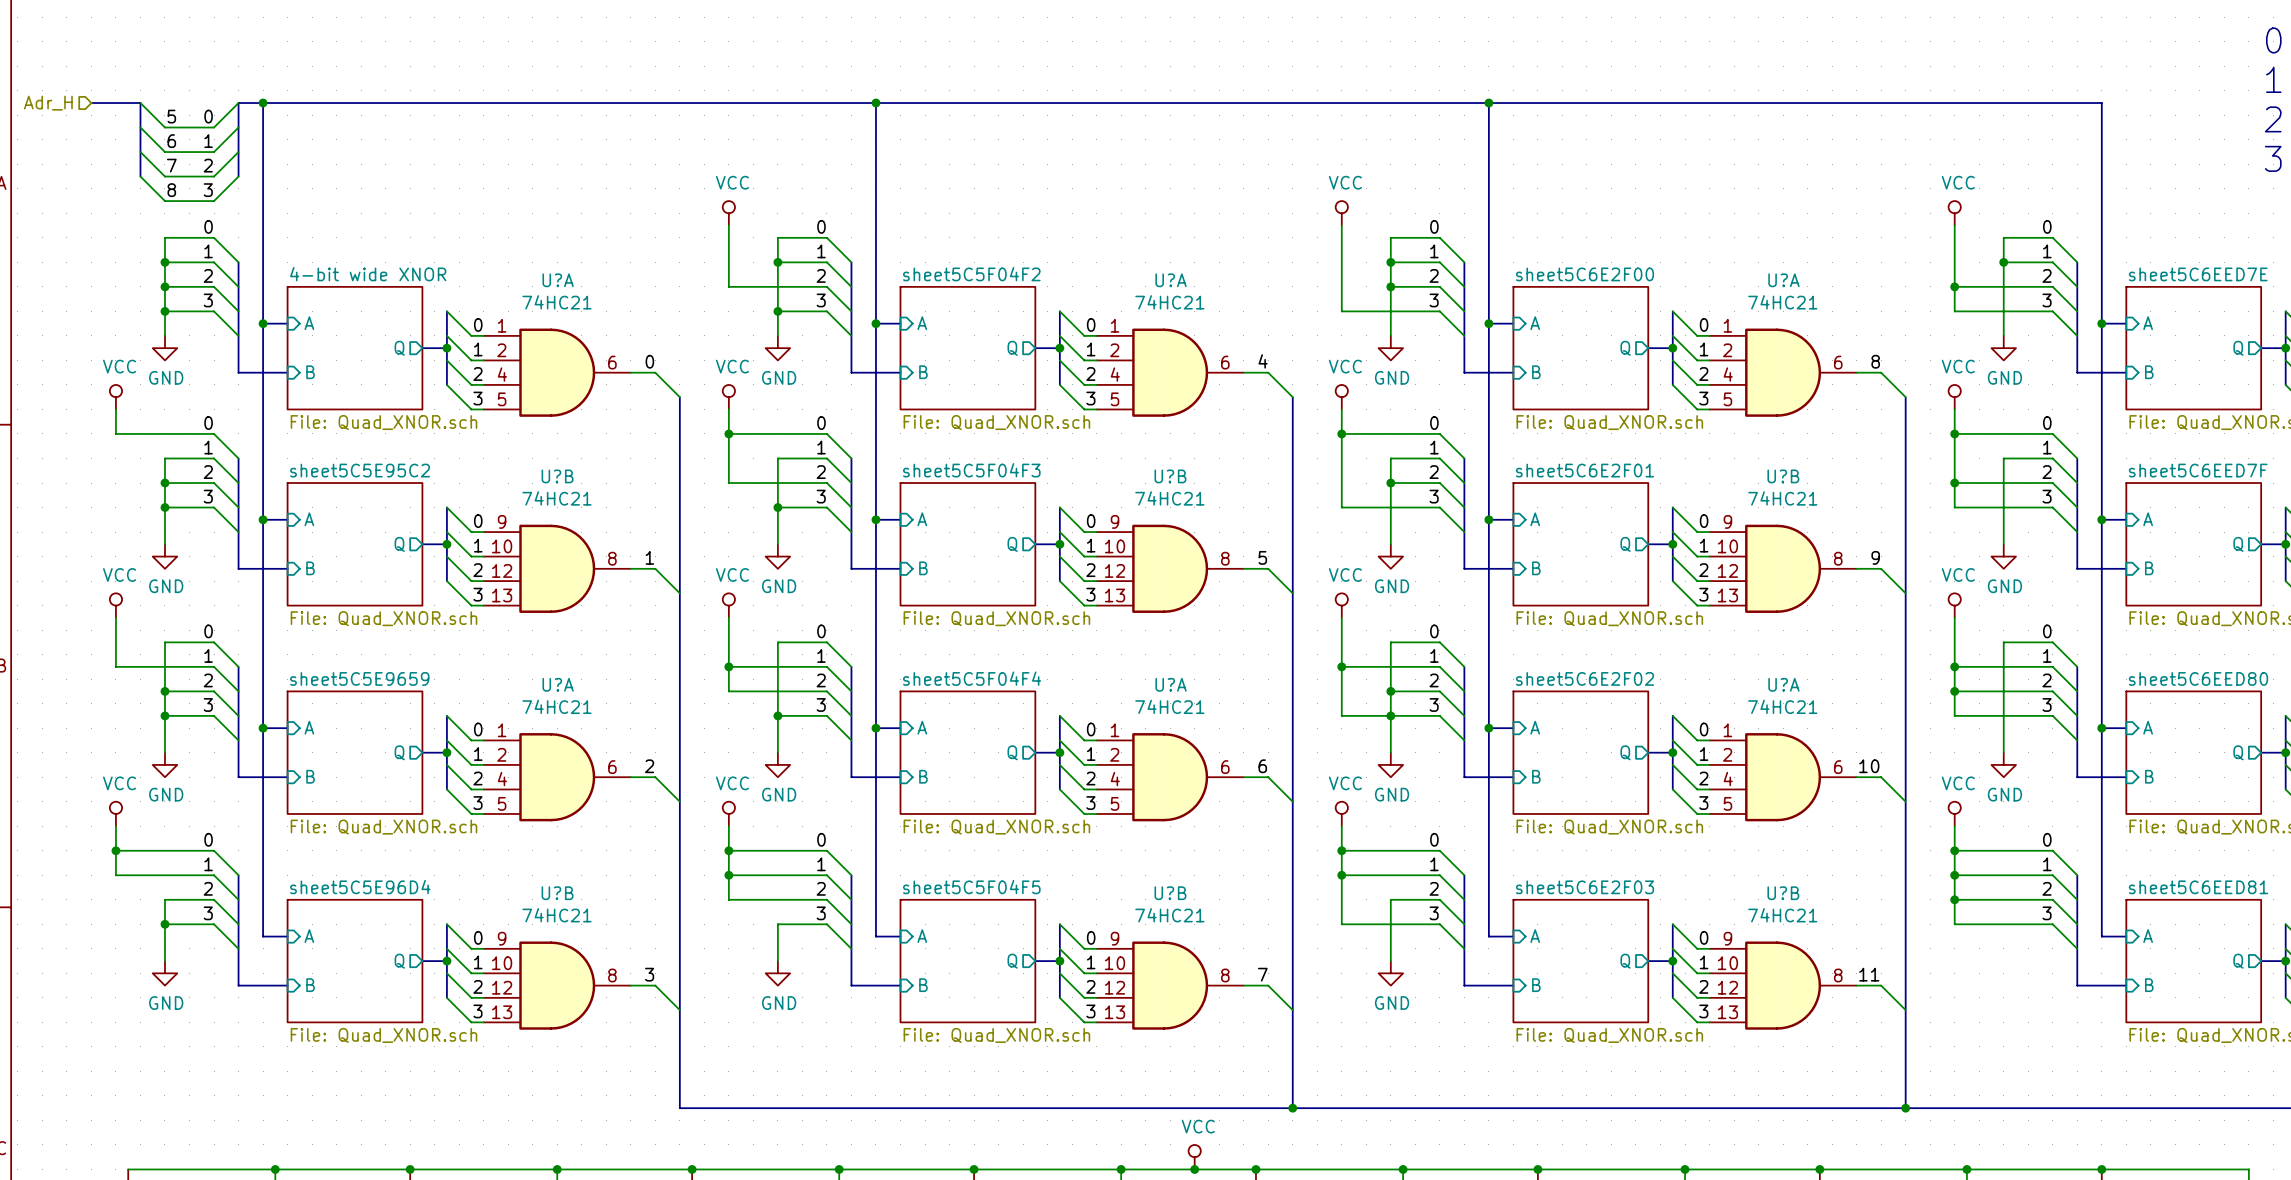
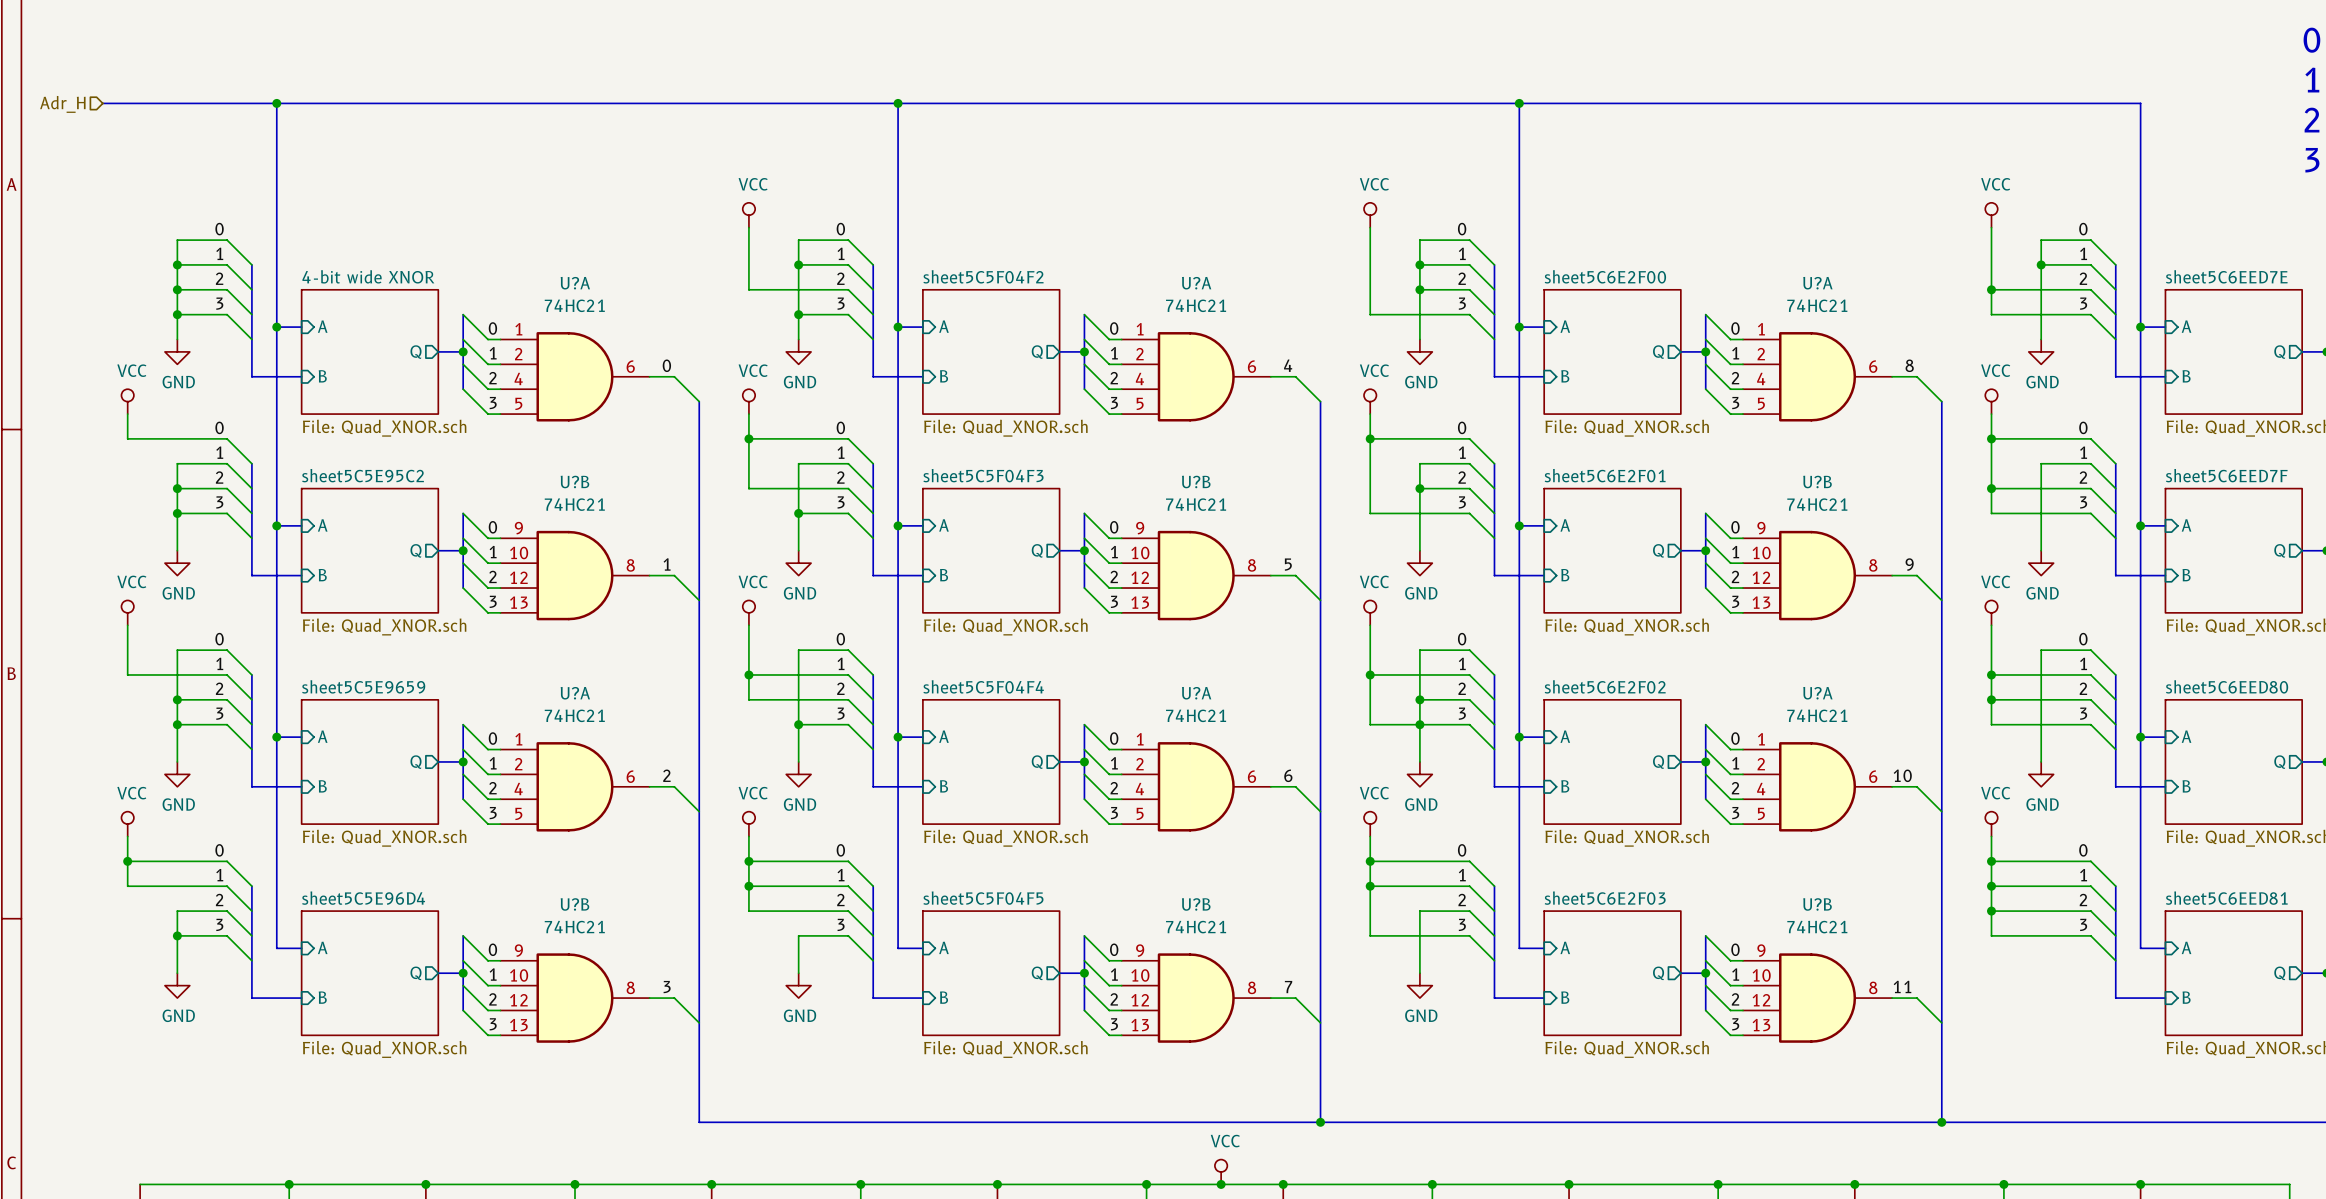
bus: (140, 103) (140, 176) -> (152, 103) (251, 103)
wire: (140, 103) (164, 127) (214, 127) (238, 103) -> none
bus: (238, 103) (238, 176) -> none
label: 5 (171, 116) -> none
label: 0 (208, 116) -> none
wire: (140, 127) (164, 152) (214, 152) (238, 127) -> none
label: 6 (171, 141) -> none
label: 1 (208, 141) -> none
wire: (140, 152) (164, 176) (214, 176) (238, 152) -> none
label: 7 (171, 165) -> none
label: 2 (208, 165) -> none
wire: (140, 176) (164, 201) (214, 201) (238, 176) -> none
label: 8 (171, 190) -> none
label: 3 (208, 190) -> none

